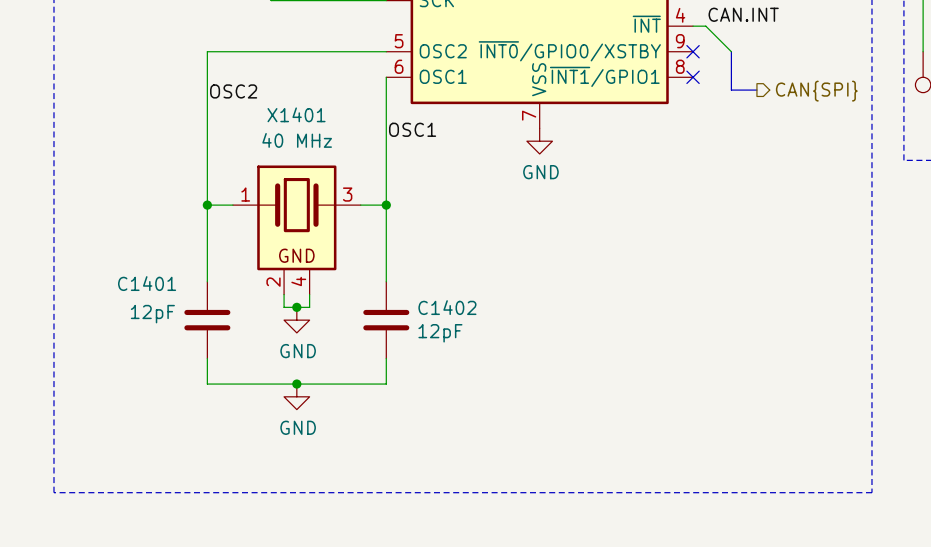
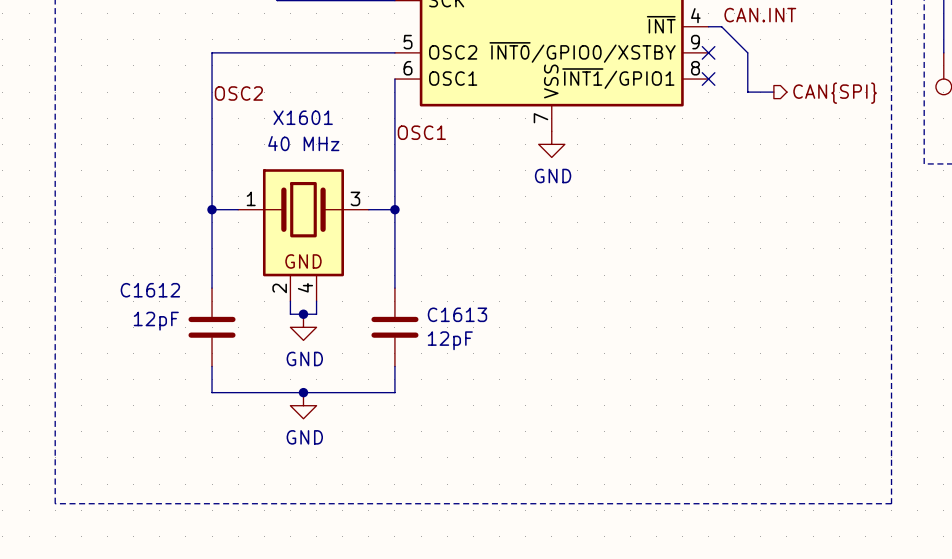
X1401 name: X1401 (296, 114) -> X1601 (303, 117)
C1401 name: C1401 (147, 283) -> C1612 (150, 290)
C1402 name: C1402 (447, 307) -> C1613 (457, 314)

